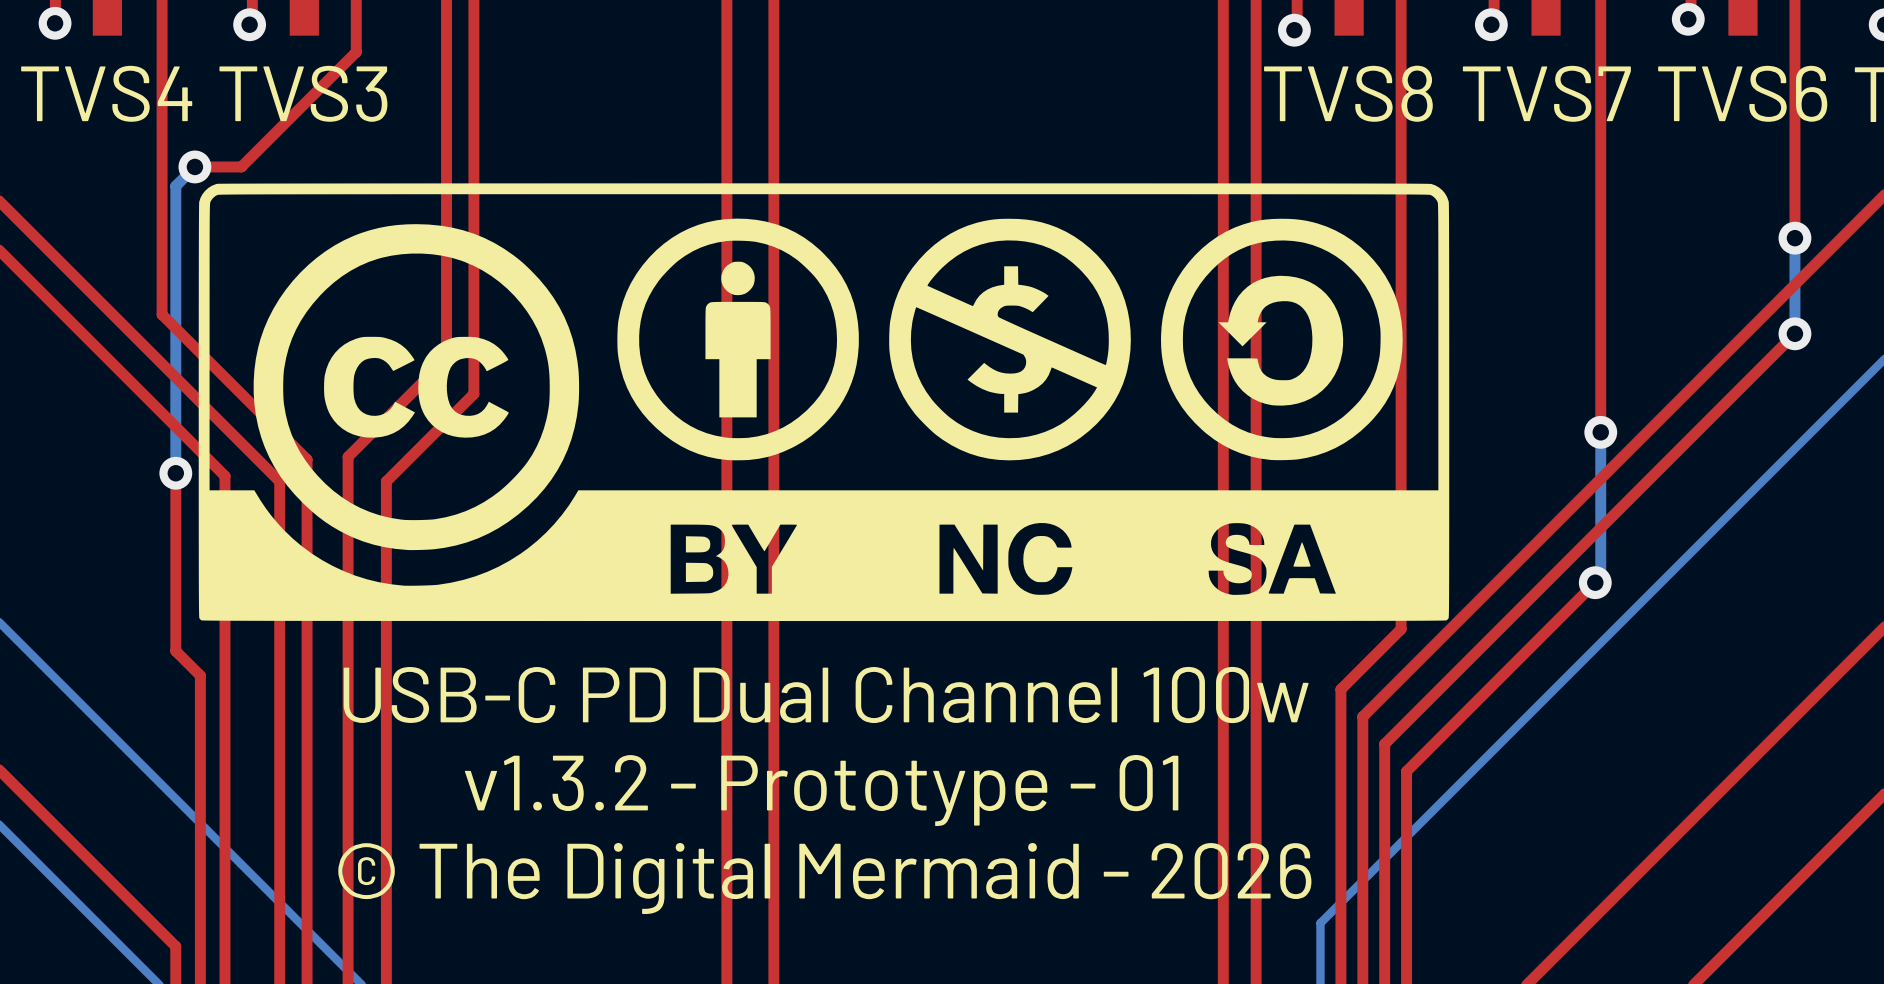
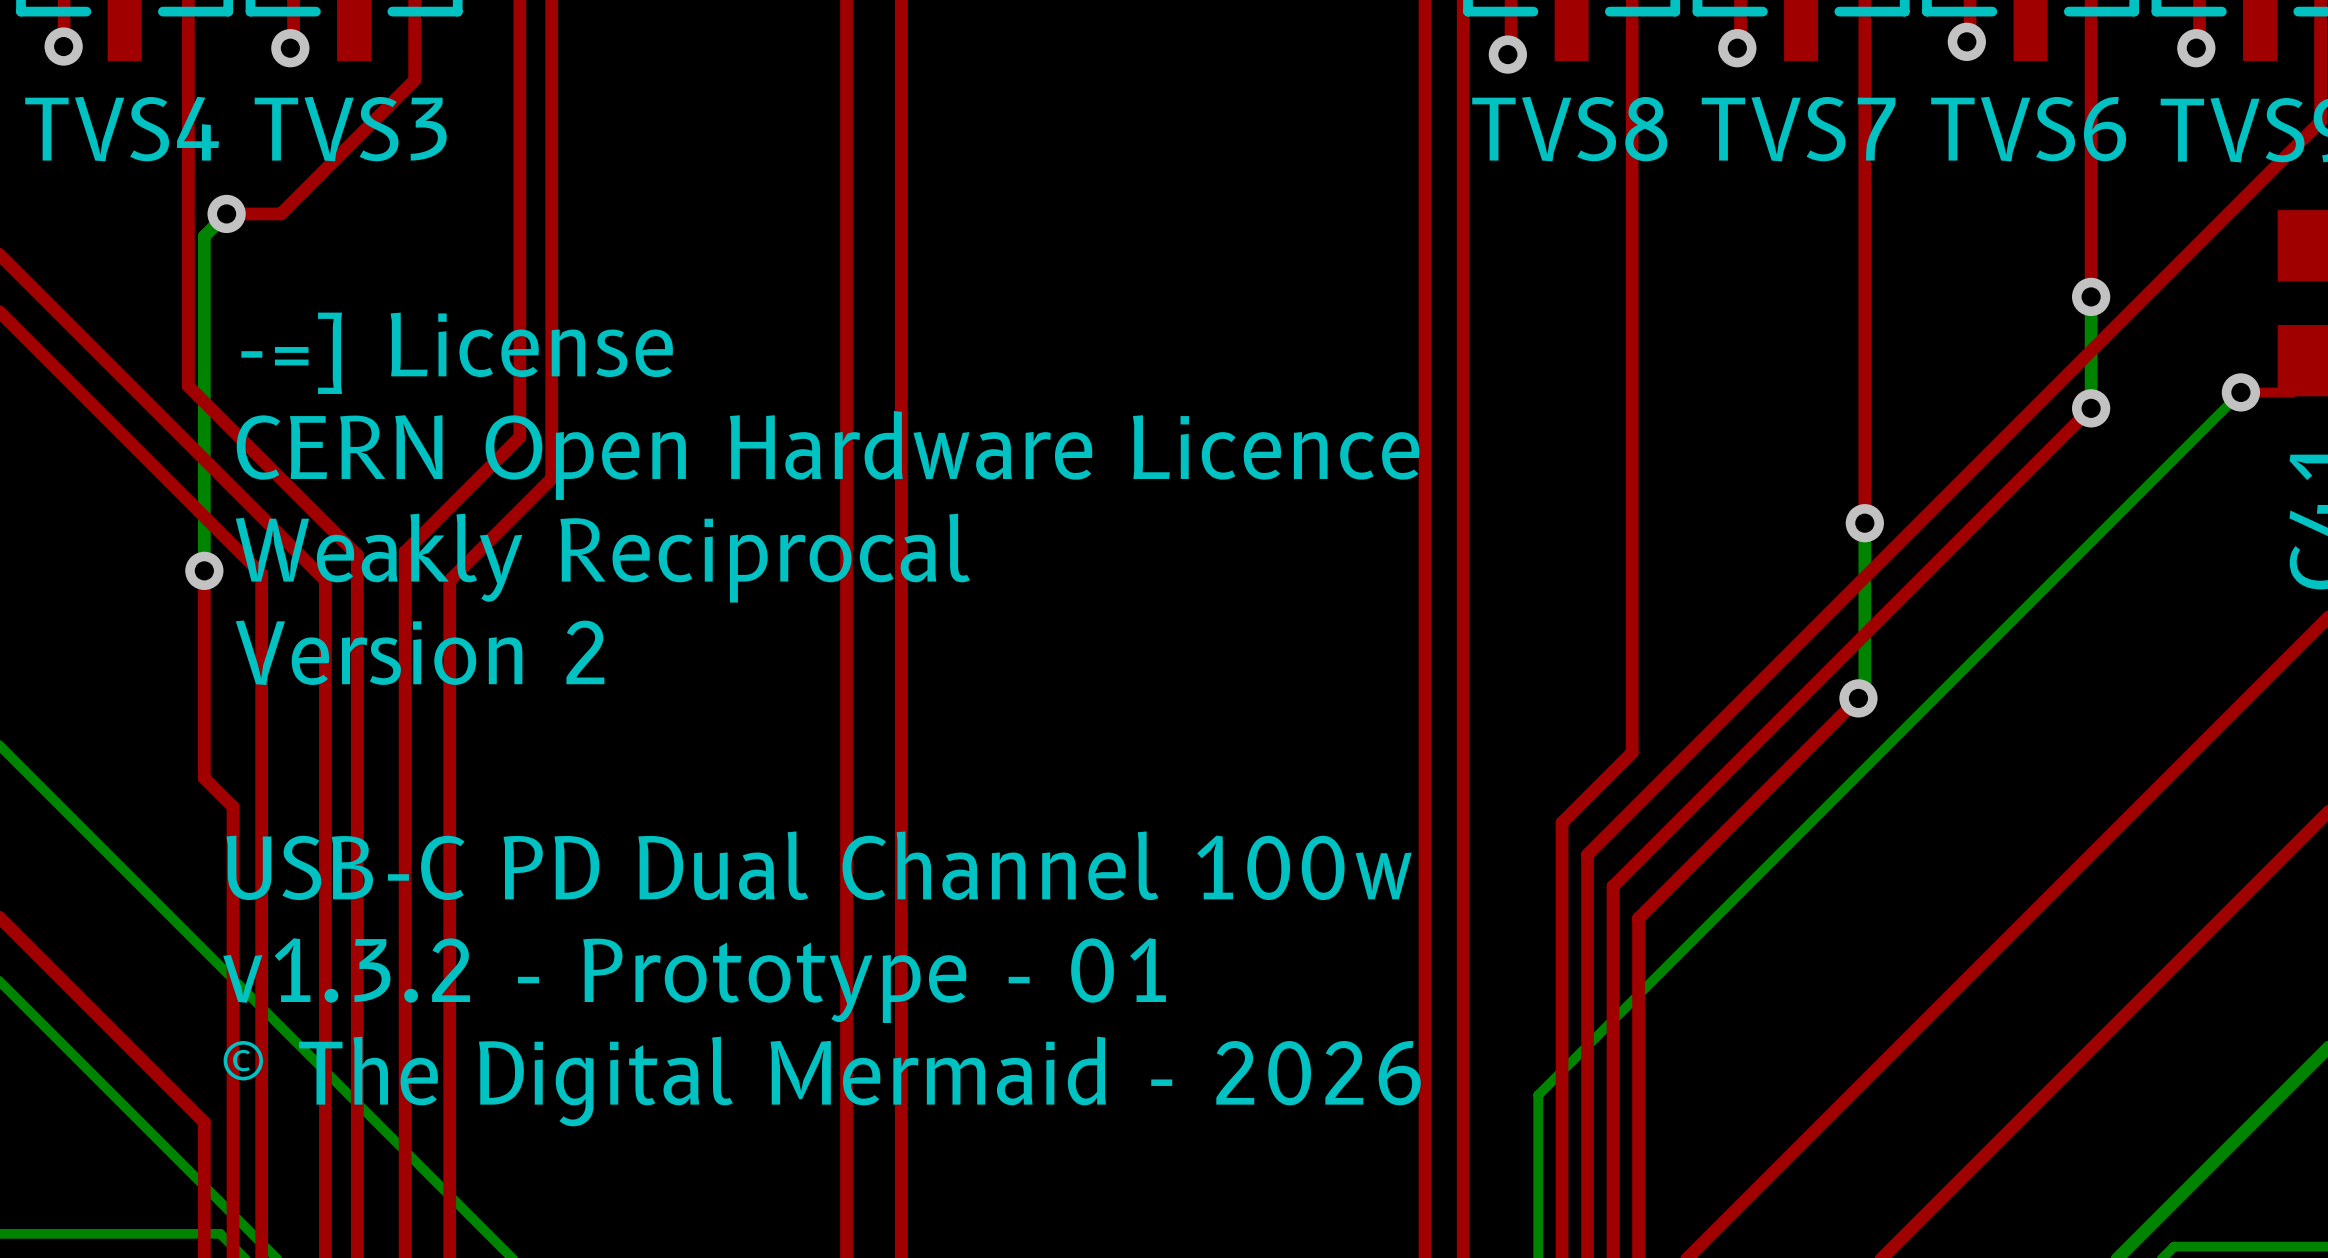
drawing: [198, 183, 1450, 622] -> none
text: none -> -=] License (457, 353)
text: none -> CERN Open Hardware Licence (828, 455)
text: none -> Weakly Reciprocal (602, 558)
text: none -> Version 2 (420, 652)
text position: USB-C PD Dual Channel 100w (826, 695) -> USB-C PD Dual Channel 100w (819, 865)
text position: v1.3.2 - Prototype - 01 (821, 790) -> v1.3.2 - Prototype - 01 (694, 980)
text position: © The Digital Mermaid - 2026 (824, 878) -> © The Digital Mermaid - 2026 (822, 1081)

